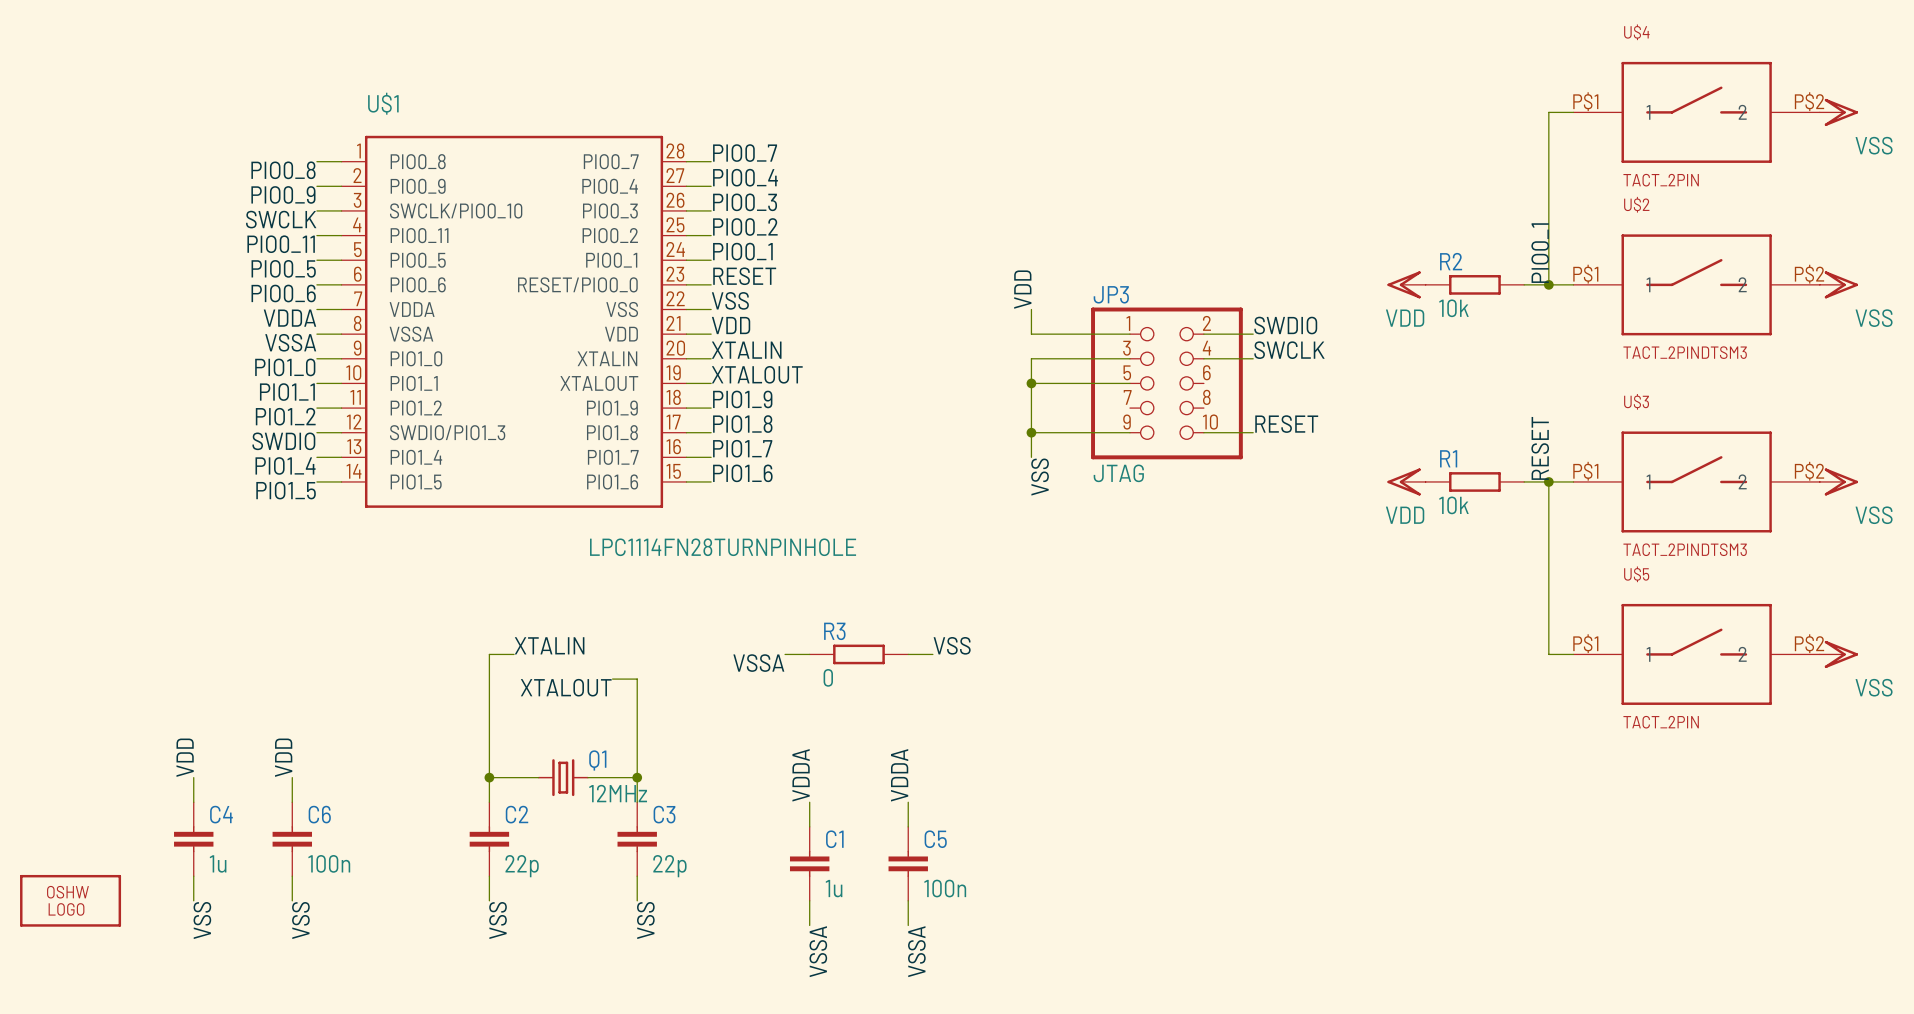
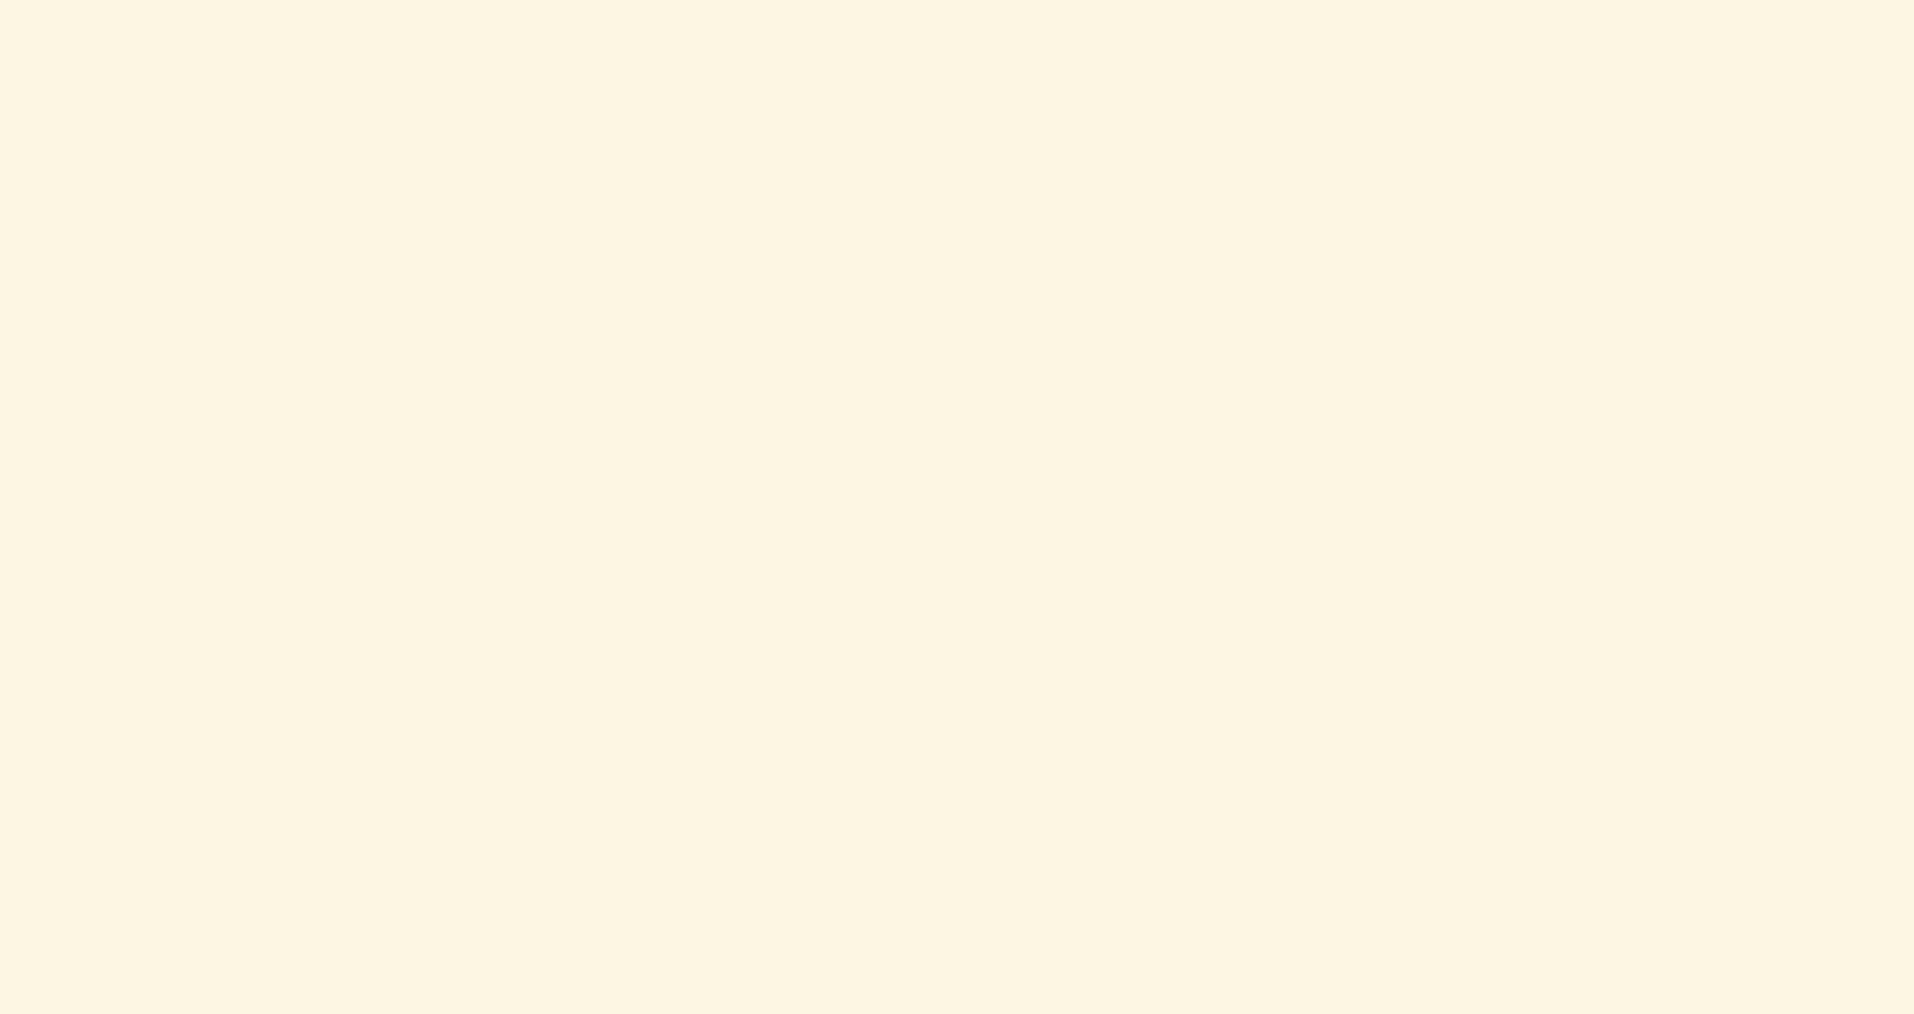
wire: (1573, 112) (1548, 112) (1548, 284) -> none
U$4: TACT_2PIN (1696, 112) -> none
power symbol: VSS (1838, 112) -> none
label: PIO0_7 (745, 153) -> none
wire: (316, 161) (341, 161) -> none
wire: (686, 161) (711, 161) -> none
label: PIO0_8 (283, 170) -> none
label: PIO0_4 (745, 177) -> none
wire: (316, 186) (341, 186) -> none
wire: (686, 186) (711, 186) -> none
label: PIO0_9 (283, 194) -> none
label: PIO0_3 (745, 202) -> none
wire: (316, 210) (341, 210) -> none
wire: (686, 210) (711, 210) -> none
label: SWCLK (281, 219) -> none
label: PIO0_2 (745, 226) -> none
wire: (316, 235) (341, 235) -> none
wire: (686, 235) (711, 235) -> none
label: PIO0_11 (281, 244) -> none
label: PIO0_1 (742, 251) -> none
label: PIO0_1 (1540, 253) -> none
wire: (316, 260) (341, 260) -> none
wire: (686, 260) (711, 260) -> none
label: PIO0_5 (283, 268) -> none
label: RESET (744, 276) -> none
wire: (316, 284) (341, 284) -> none
wire: (686, 284) (711, 284) -> none
power symbol: VDD (1406, 284) -> none
R2: 10k (1474, 284) -> none
wire: (1524, 284) (1573, 284) -> none
junction: (1548, 284) -> none
U$2: TACT_2PINDTSM3 (1696, 284) -> none
power symbol: VSS (1838, 284) -> none
label: VDD (1022, 289) -> none
label: PIO0_6 (283, 293) -> none
label: VSS (730, 300) -> none
wire: (316, 309) (341, 309) -> none
wire: (686, 309) (711, 309) -> none
wire: (1031, 309) (1031, 334) (1129, 334) -> none
label: VDDA (289, 318) -> none
U$1: LPC1114FN28TURNPINHOLE (514, 321) -> none
label: VDD (731, 325) -> none
label: SWDIO (1285, 325) -> none
wire: (316, 334) (341, 334) -> none
wire: (686, 334) (711, 334) -> none
wire: (1203, 334) (1253, 334) -> none
label: VSSA (290, 342) -> none
label: XTALIN (746, 350) -> none
label: SWCLK (1289, 350) -> none
wire: (316, 358) (341, 358) -> none
wire: (686, 358) (711, 358) -> none
wire: (1129, 358) (1031, 358) (1031, 457) -> none
wire: (1203, 358) (1253, 358) -> none
label: PIO1_0 (285, 367) -> none
label: XTALOUT (757, 374) -> none
wire: (316, 383) (341, 383) -> none
wire: (686, 383) (711, 383) -> none
wire: (1031, 383) (1129, 383) -> none
junction: (1031, 383) -> none
JP3: JTAG (1166, 383) -> none
label: PIO1_1 (287, 392) -> none
label: PIO1_9 (742, 399) -> none
wire: (316, 408) (341, 408) -> none
wire: (686, 408) (711, 408) -> none
label: PIO1_2 (285, 416) -> none
label: PIO1_8 (742, 424) -> none
label: RESET (1286, 424) -> none
wire: (316, 432) (341, 432) -> none
wire: (686, 432) (711, 432) -> none
wire: (1031, 432) (1129, 432) -> none
junction: (1031, 432) -> none
wire: (1203, 432) (1253, 432) -> none
label: SWDIO (283, 441) -> none
label: PIO1_7 (742, 448) -> none
label: RESET (1540, 448) -> none
wire: (316, 457) (341, 457) -> none
wire: (686, 457) (711, 457) -> none
label: PIO1_4 (285, 465) -> none
label: PIO1_6 (742, 473) -> none
label: VSS (1040, 477) -> none
wire: (316, 481) (341, 481) -> none
wire: (686, 481) (711, 481) -> none
power symbol: VDD (1406, 481) -> none
R1: 10k (1474, 481) -> none
wire: (1524, 481) (1573, 481) -> none
wire: (1548, 481) (1548, 654) (1573, 654) -> none
junction: (1548, 481) -> none
U$3: TACT_2PINDTSM3 (1696, 481) -> none
power symbol: VSS (1838, 481) -> none
label: PIO1_5 (286, 490) -> none
label: XTALIN (549, 645) -> none
label: VSS (952, 645) -> none
wire: (514, 654) (489, 654) (489, 802) -> none
wire: (785, 654) (809, 654) -> none
R3: 0 (858, 654) -> none
wire: (908, 654) (932, 654) -> none
U$5: TACT_2PIN (1696, 654) -> none
power symbol: VSS (1838, 654) -> none
label: VSSA (758, 663) -> none
wire: (612, 679) (637, 679) (637, 802) -> none
label: XTALOUT (566, 687) -> none
label: VDD (185, 757) -> none
label: VDD (283, 757) -> none
label: VDDA (801, 775) -> none
label: VDDA (899, 775) -> none
wire: (193, 777) (193, 802) -> none
wire: (292, 777) (292, 802) -> none
wire: (489, 777) (538, 777) -> none
junction: (489, 777) -> none
Q1: 12MHz (563, 777) -> none
wire: (587, 777) (637, 777) -> none
junction: (637, 777) -> none
wire: (809, 802) (809, 826) -> none
wire: (908, 802) (908, 826) -> none
C4: 1u (193, 839) -> none
C6: 100n (292, 839) -> none
C2: 22p (489, 839) -> none
C3: 22p (637, 839) -> none
C1: 1u (809, 863) -> none
C5: 100n (908, 863) -> none
wire: (193, 876) (193, 900) -> none
wire: (292, 876) (292, 900) -> none
wire: (489, 876) (489, 900) -> none
wire: (637, 876) (637, 900) -> none
part: (70, 900) -> none
wire: (809, 900) (809, 925) -> none
wire: (908, 900) (908, 925) -> none
label: VSS (202, 920) -> none
label: VSS (300, 920) -> none
label: VSS (498, 920) -> none
label: VSS (645, 920) -> none
label: VSSA (818, 951) -> none
label: VSSA (916, 951) -> none

